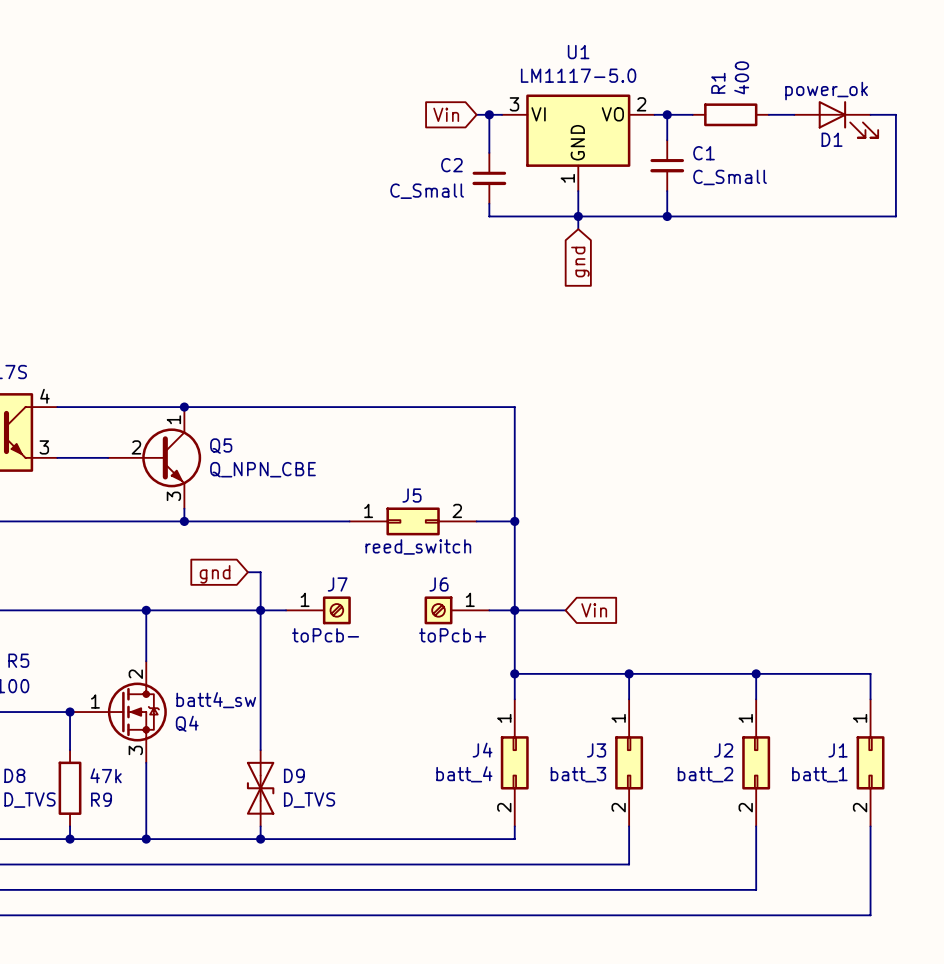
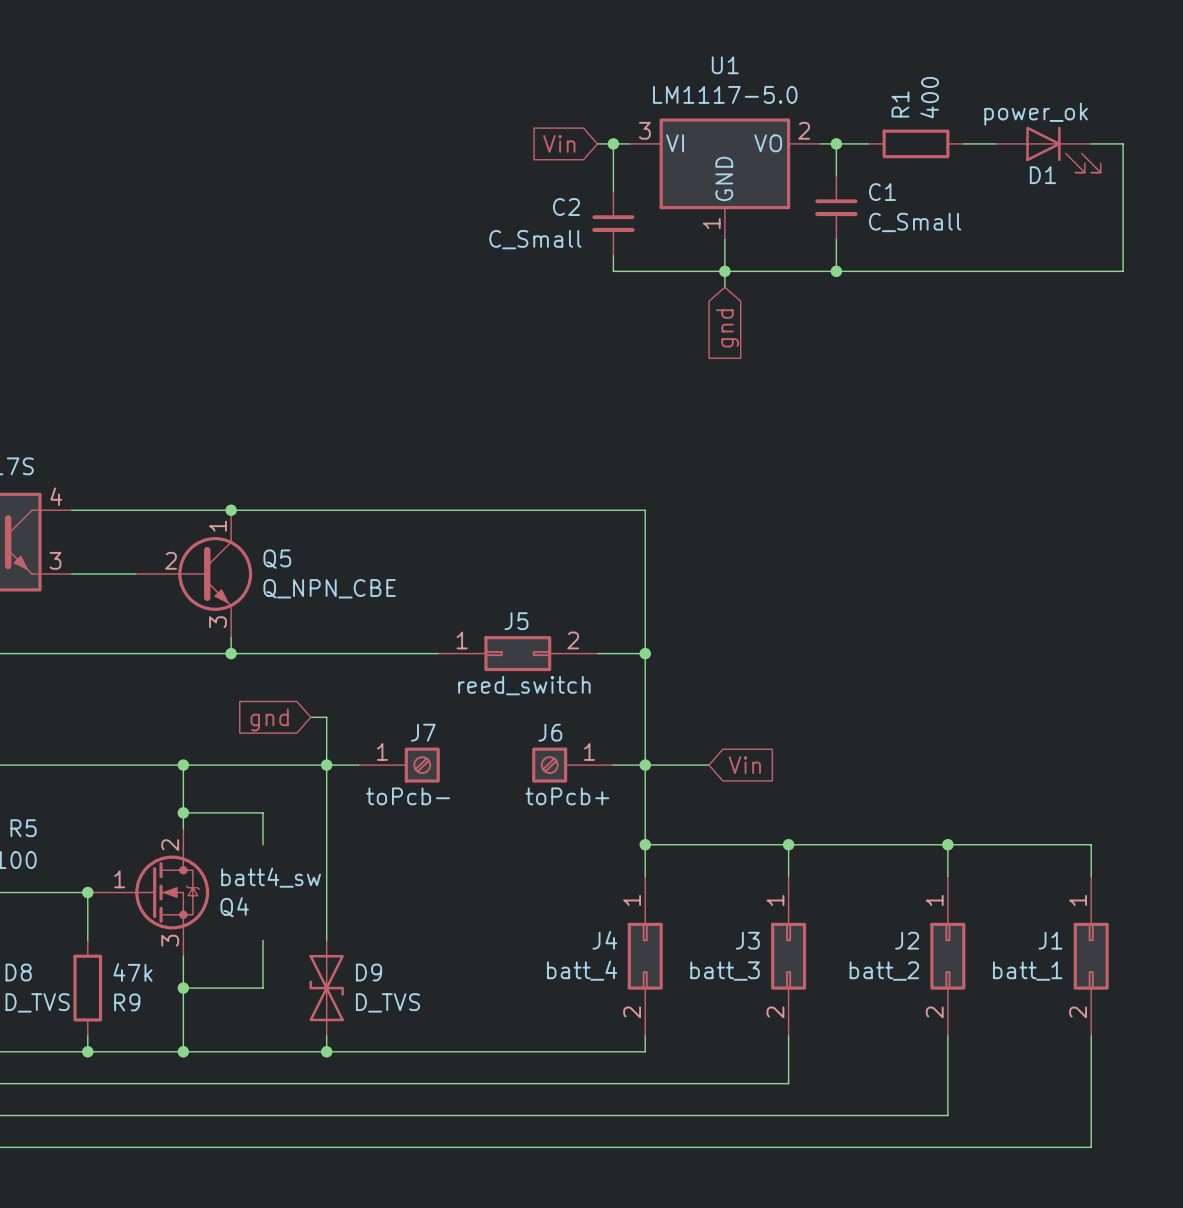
wire: none -> (183, 812) (262, 812) (262, 844)
junction: none -> (183, 812)
wire: none -> (262, 940) (262, 988) (183, 988)
junction: none -> (183, 988)

